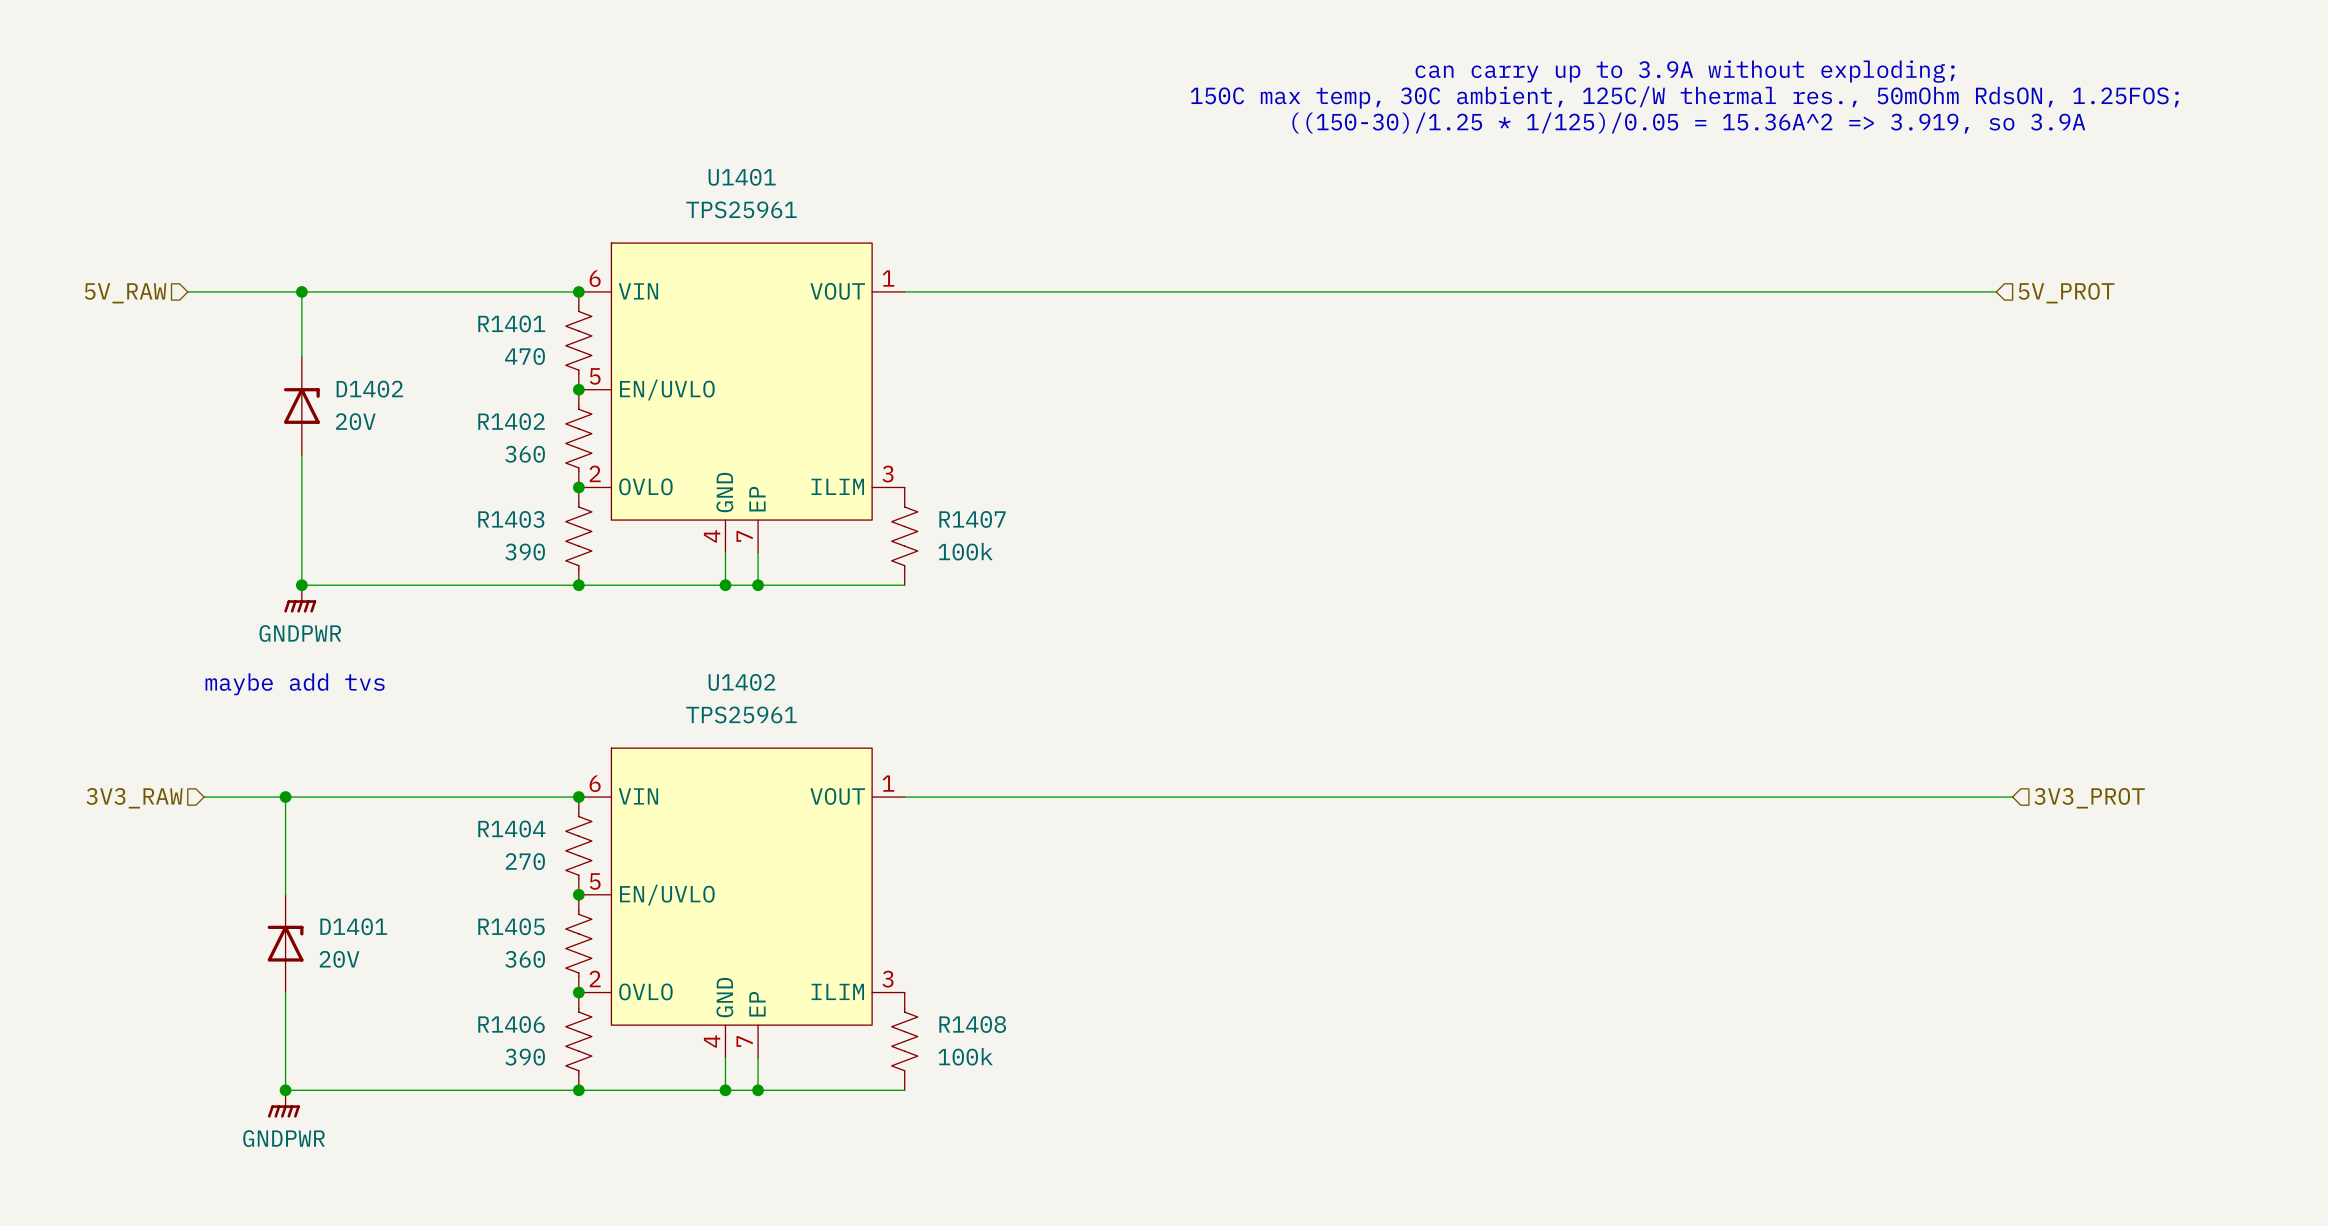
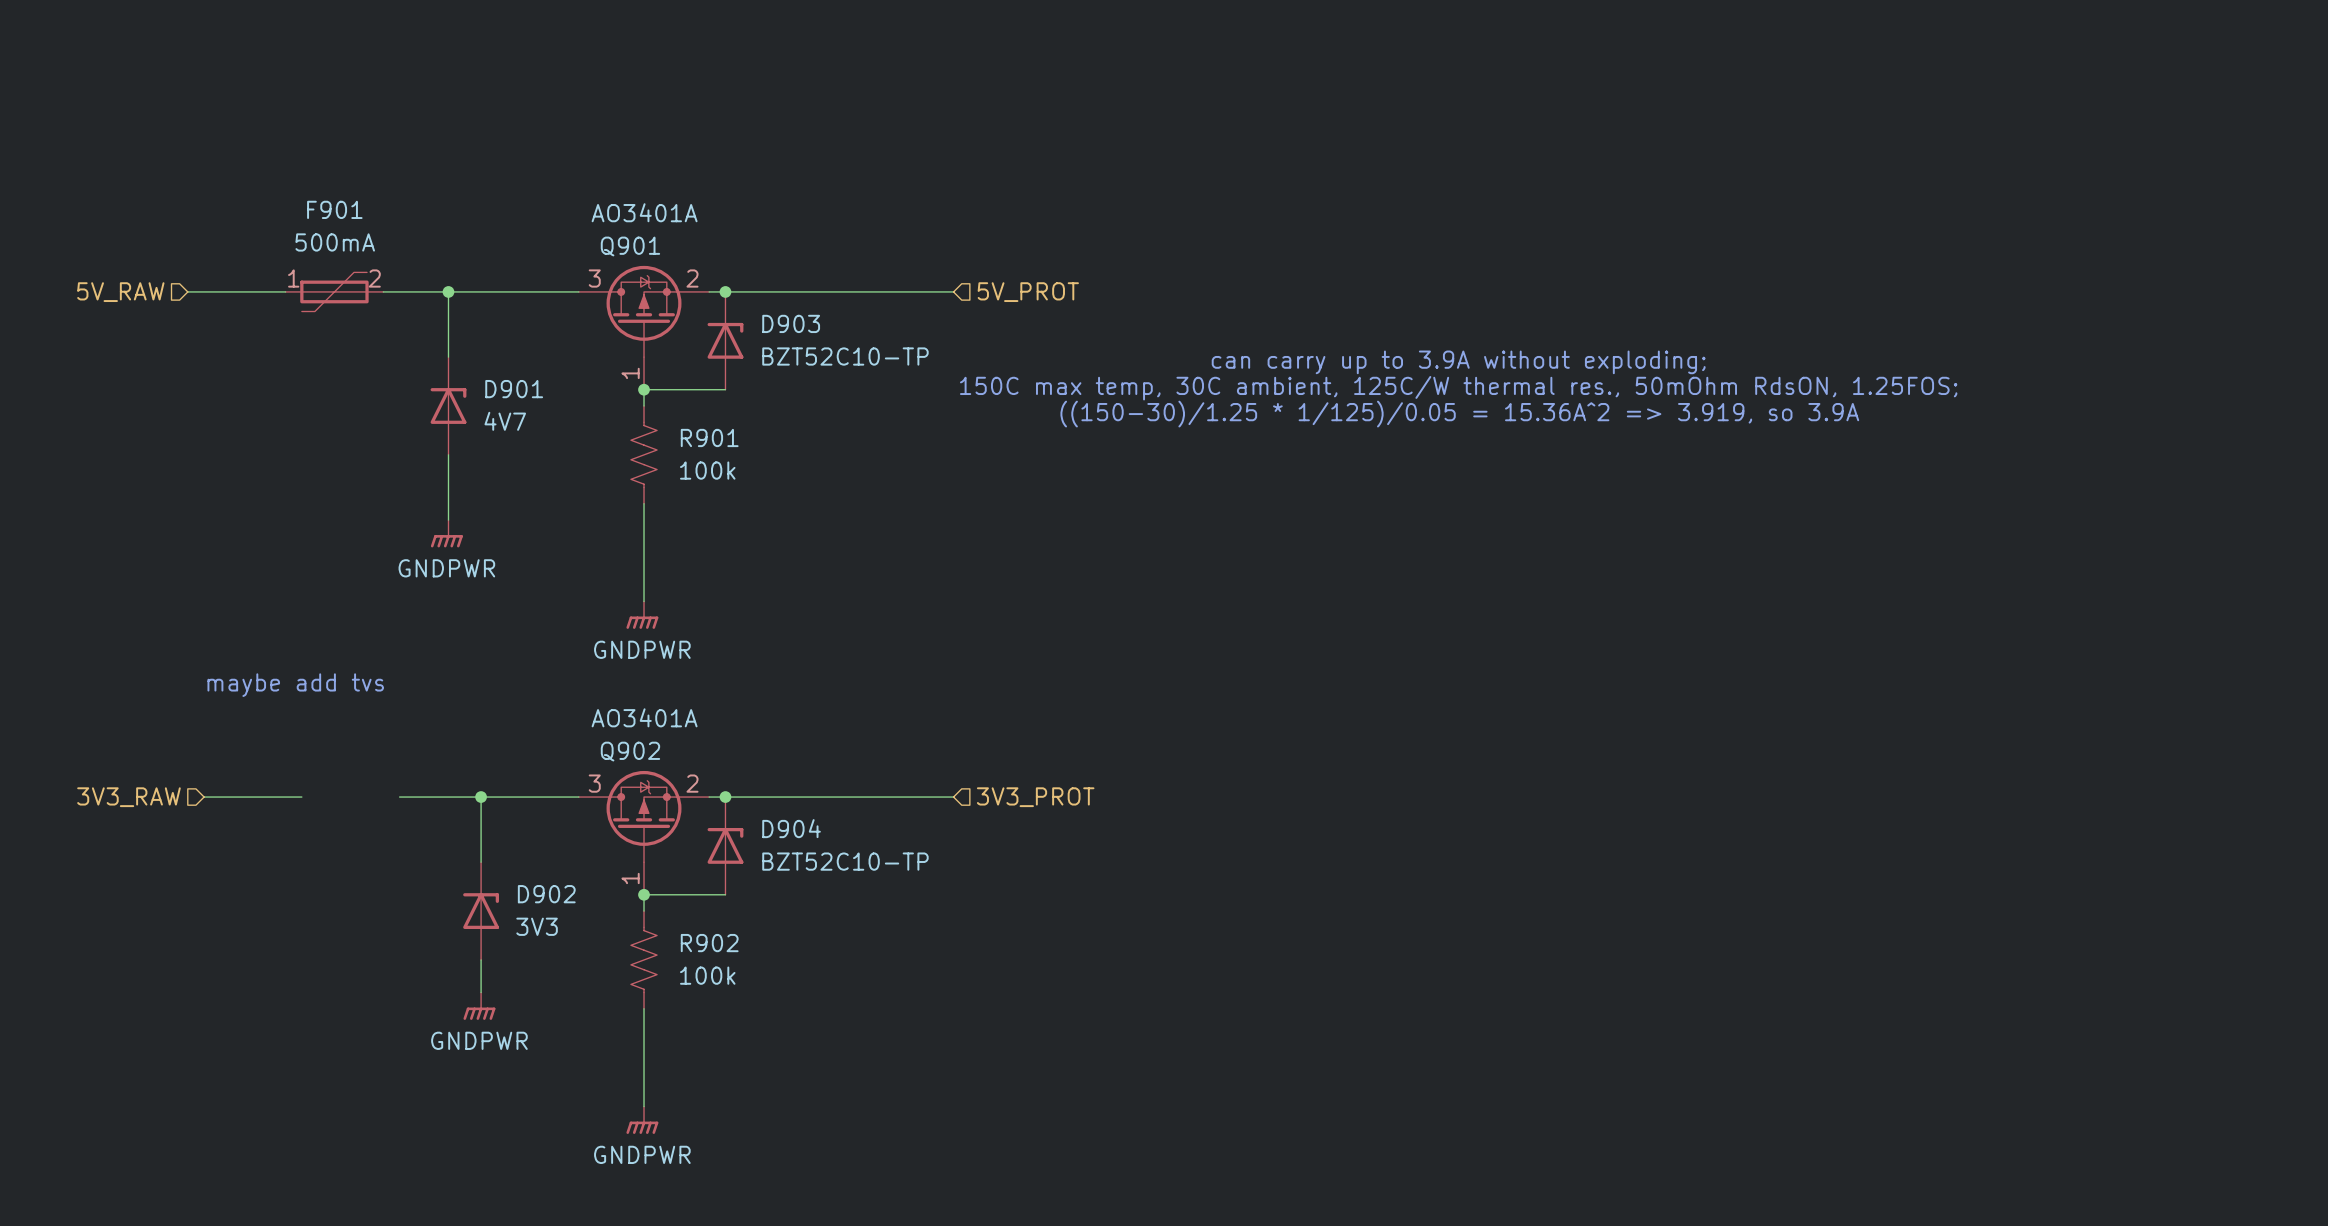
text: can carry up to 3.9A without exploding; (1685, 71) -> none
text: 150C max temp, 30C ambient, 125C/W thermal res., 50mOhm RdsON, 1.25FOS; (1684, 97) -> none
text: ((150-30)/1.25 * 1/125)/0.05 = 15.36A^2 => 3.919, so 3.9A (1688, 123) -> none
wire: (301, 291) (301, 357) -> (448, 291) (448, 357)
junction: (301, 291) -> none
F901: none -> 500mA (334, 291)
junction: none -> (448, 291)
junction: (578, 291) -> none
junction: none -> (725, 291)
wire: (953, 291) (1996, 291) -> none
hierarchical label: none -> 5V_PROT (1028, 292)
hierarchical label: 5V_PROT (2066, 293) -> none
Q901: none -> AO3401A (644, 327)
R1401: 470 (578, 340) -> none
D903: none -> BZT52C10-TP (725, 340)
text: none -> can carry up to 3.9A without exploding; (1458, 362)
text: none -> 150C max temp, 30C ambient, 125C/W thermal res., 50mOhm RdsON, 1.25FOS; (1458, 388)
junction: (578, 389) -> none
junction: none -> (644, 389)
U1401: TPS25961 (741, 397) -> none
D1402: 20V (301, 406) -> none
D901: none -> 4V7 (448, 406)
text: none -> ((150-30)/1.25 * 1/125)/0.05 = 15.36A^2 => 3.919, so 3.9A (1459, 414)
R1402: 360 (578, 438) -> none
wire: (301, 454) (301, 585) (904, 585) -> none
wire: none -> (448, 454) (448, 520)
R901: none -> 100k (644, 454)
junction: (578, 487) -> none
wire: none -> (644, 503) (644, 601)
R1403: 390 (578, 536) -> none
R1407: 100k (904, 536) -> none
wire: (725, 552) (725, 585) -> none
wire: (758, 552) (758, 585) -> none
junction: (301, 585) -> none
junction: (578, 585) -> none
junction: (725, 585) -> none
junction: (758, 585) -> none
power symbol position: GNDPWR (300, 598) -> GNDPWR (446, 533)
power symbol: none -> GNDPWR (642, 615)
wire: (285, 797) (285, 894) -> none
junction: (285, 797) -> none
wire: (301, 797) (399, 797) -> none
wire: none -> (481, 797) (481, 862)
junction: none -> (481, 797)
junction: (578, 797) -> none
junction: none -> (725, 797)
wire: (953, 797) (2012, 797) -> none
hierarchical label: none -> 3V3_PROT (1035, 797)
hierarchical label: 3V3_PROT (2089, 798) -> none
Q902: none -> AO3401A (644, 832)
R1404: 270 (578, 845) -> none
D904: none -> BZT52C10-TP (725, 845)
junction: (578, 894) -> none
junction: none -> (644, 894)
U1402: TPS25961 (741, 902) -> none
D902: none -> 3V3 (481, 911)
D1401: 20V (285, 943) -> none
R1405: 360 (578, 943) -> none
R902: none -> 100k (644, 959)
wire: (285, 992) (285, 1090) (904, 1090) -> none
junction: (578, 992) -> none
power symbol: none -> GNDPWR (479, 1006)
wire: none -> (644, 1008) (644, 1106)
R1406: 390 (578, 1041) -> none
R1408: 100k (904, 1041) -> none
wire: (725, 1057) (725, 1090) -> (481, 959) (481, 992)
wire: (758, 1057) (758, 1090) -> none
junction: (285, 1090) -> none
junction: (578, 1090) -> none
junction: (725, 1090) -> none
junction: (758, 1090) -> none
power symbol: GNDPWR (283, 1103) -> none
power symbol: none -> GNDPWR (642, 1120)

